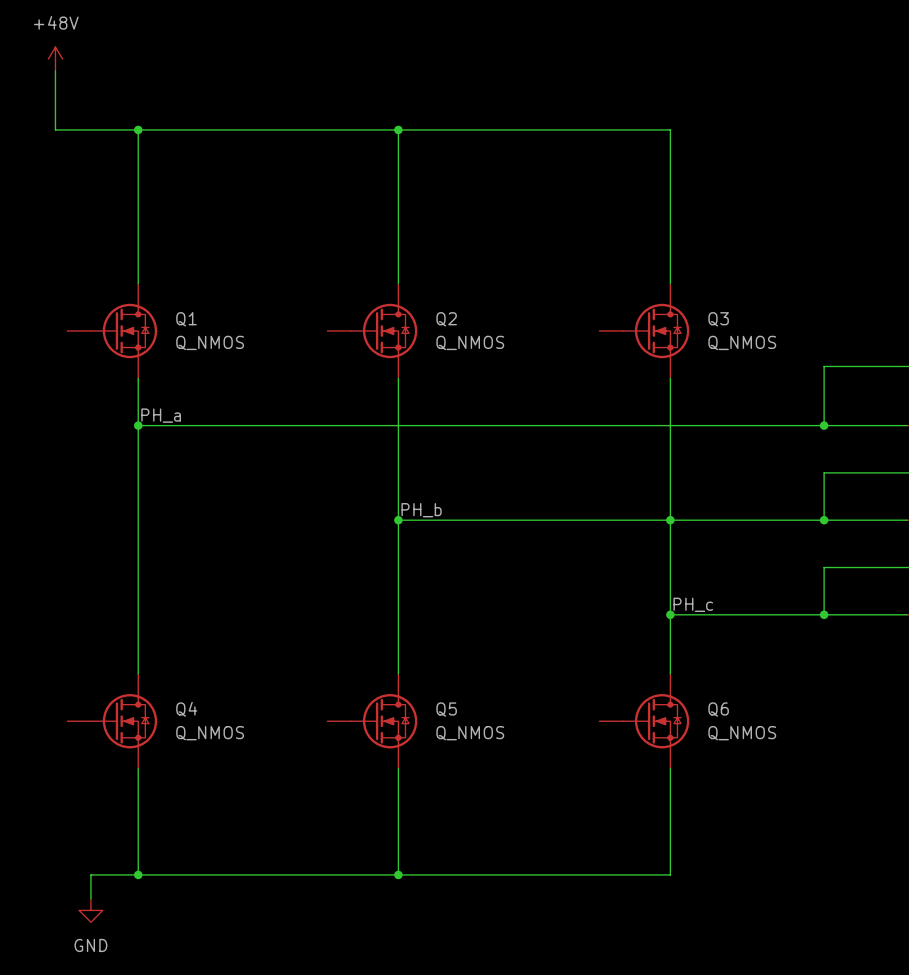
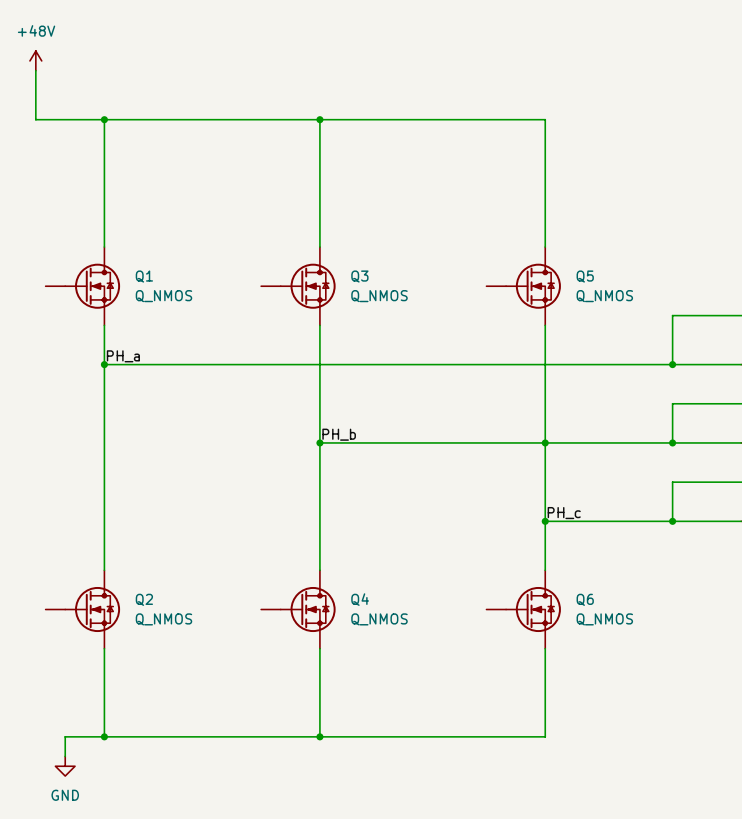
Q2 name: Q2 (446, 319) -> Q3 (359, 276)
Q3 name: Q3 (718, 319) -> Q5 (585, 276)
Q4 name: Q4 (186, 709) -> Q2 (144, 599)
Q5 name: Q5 (446, 709) -> Q4 (360, 599)

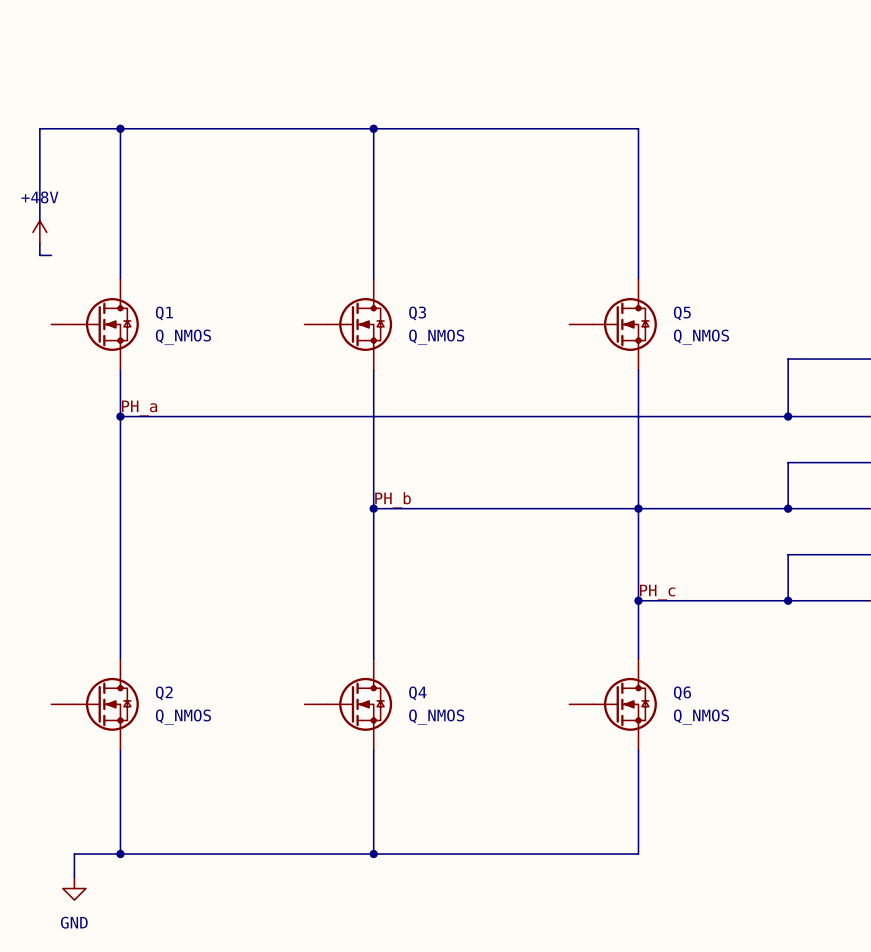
power symbol position: +48V (35, 60) -> +48V (39, 232)
wire: (35, 70) (35, 119) -> (39, 220) (39, 128)
wire: none -> (39, 243) (39, 255) (51, 255)

